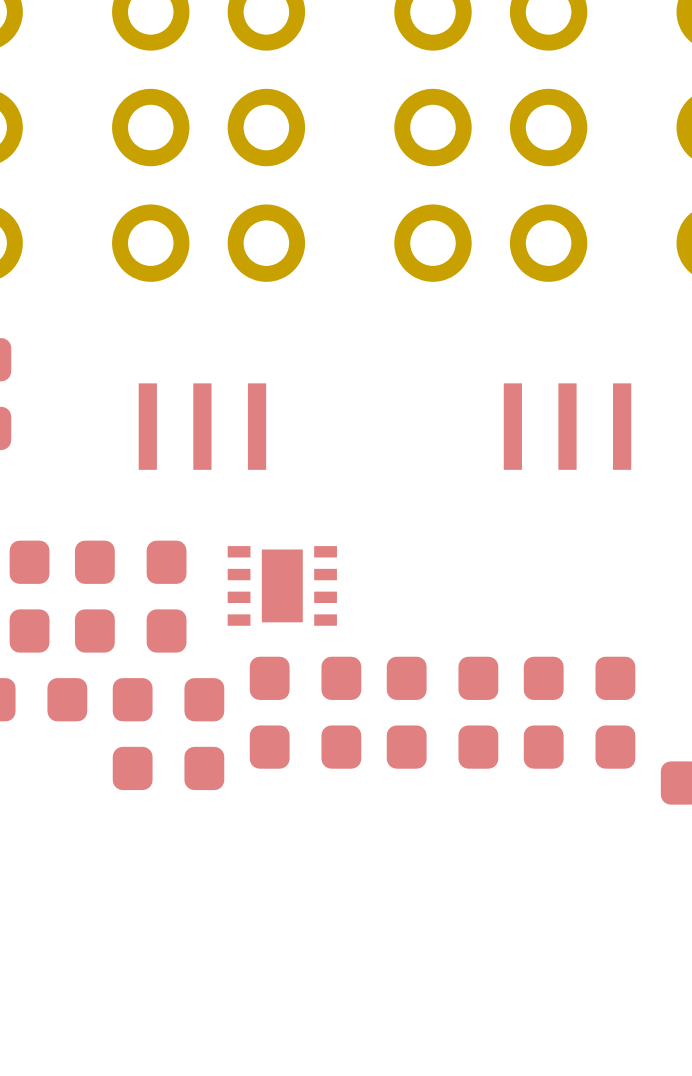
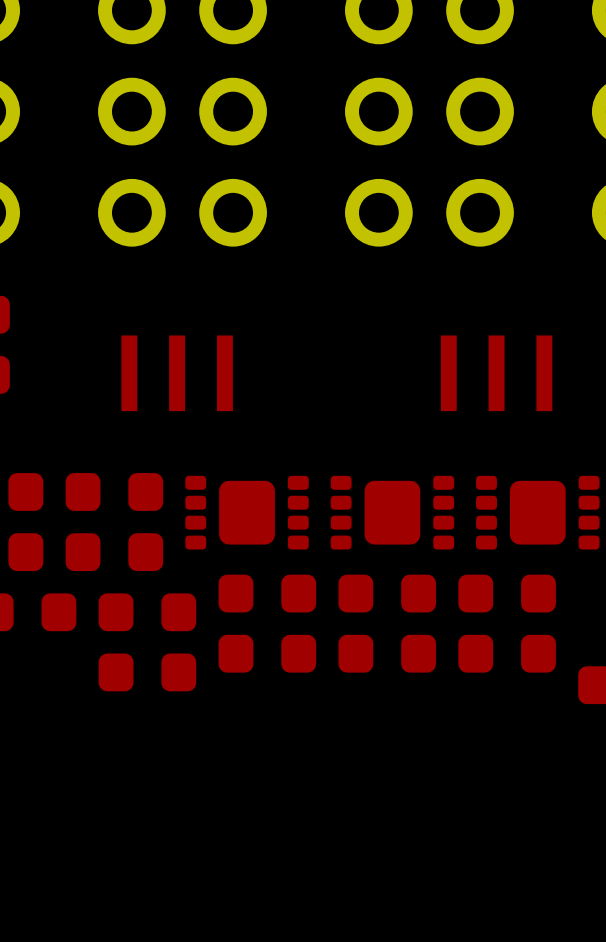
part footprint: [227, 546, 337, 626] -> [185, 475, 309, 550]
part: none -> (392, 512)
part: none -> (537, 512)

